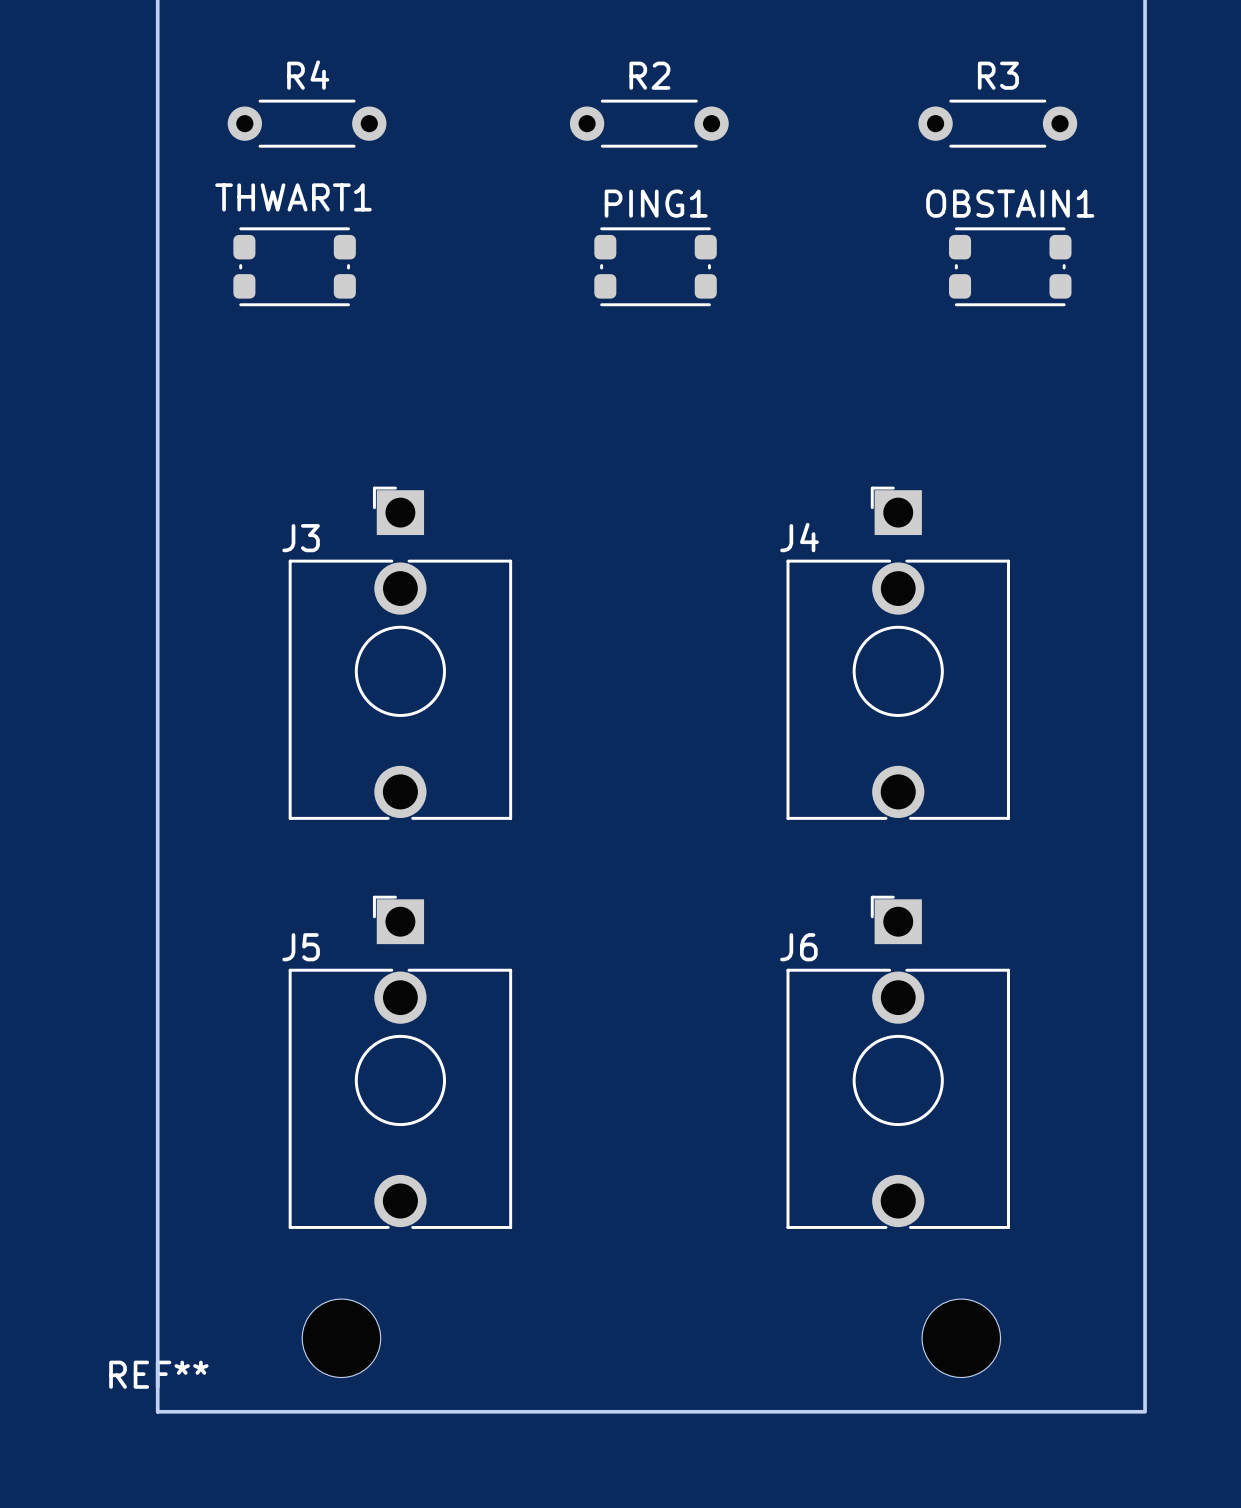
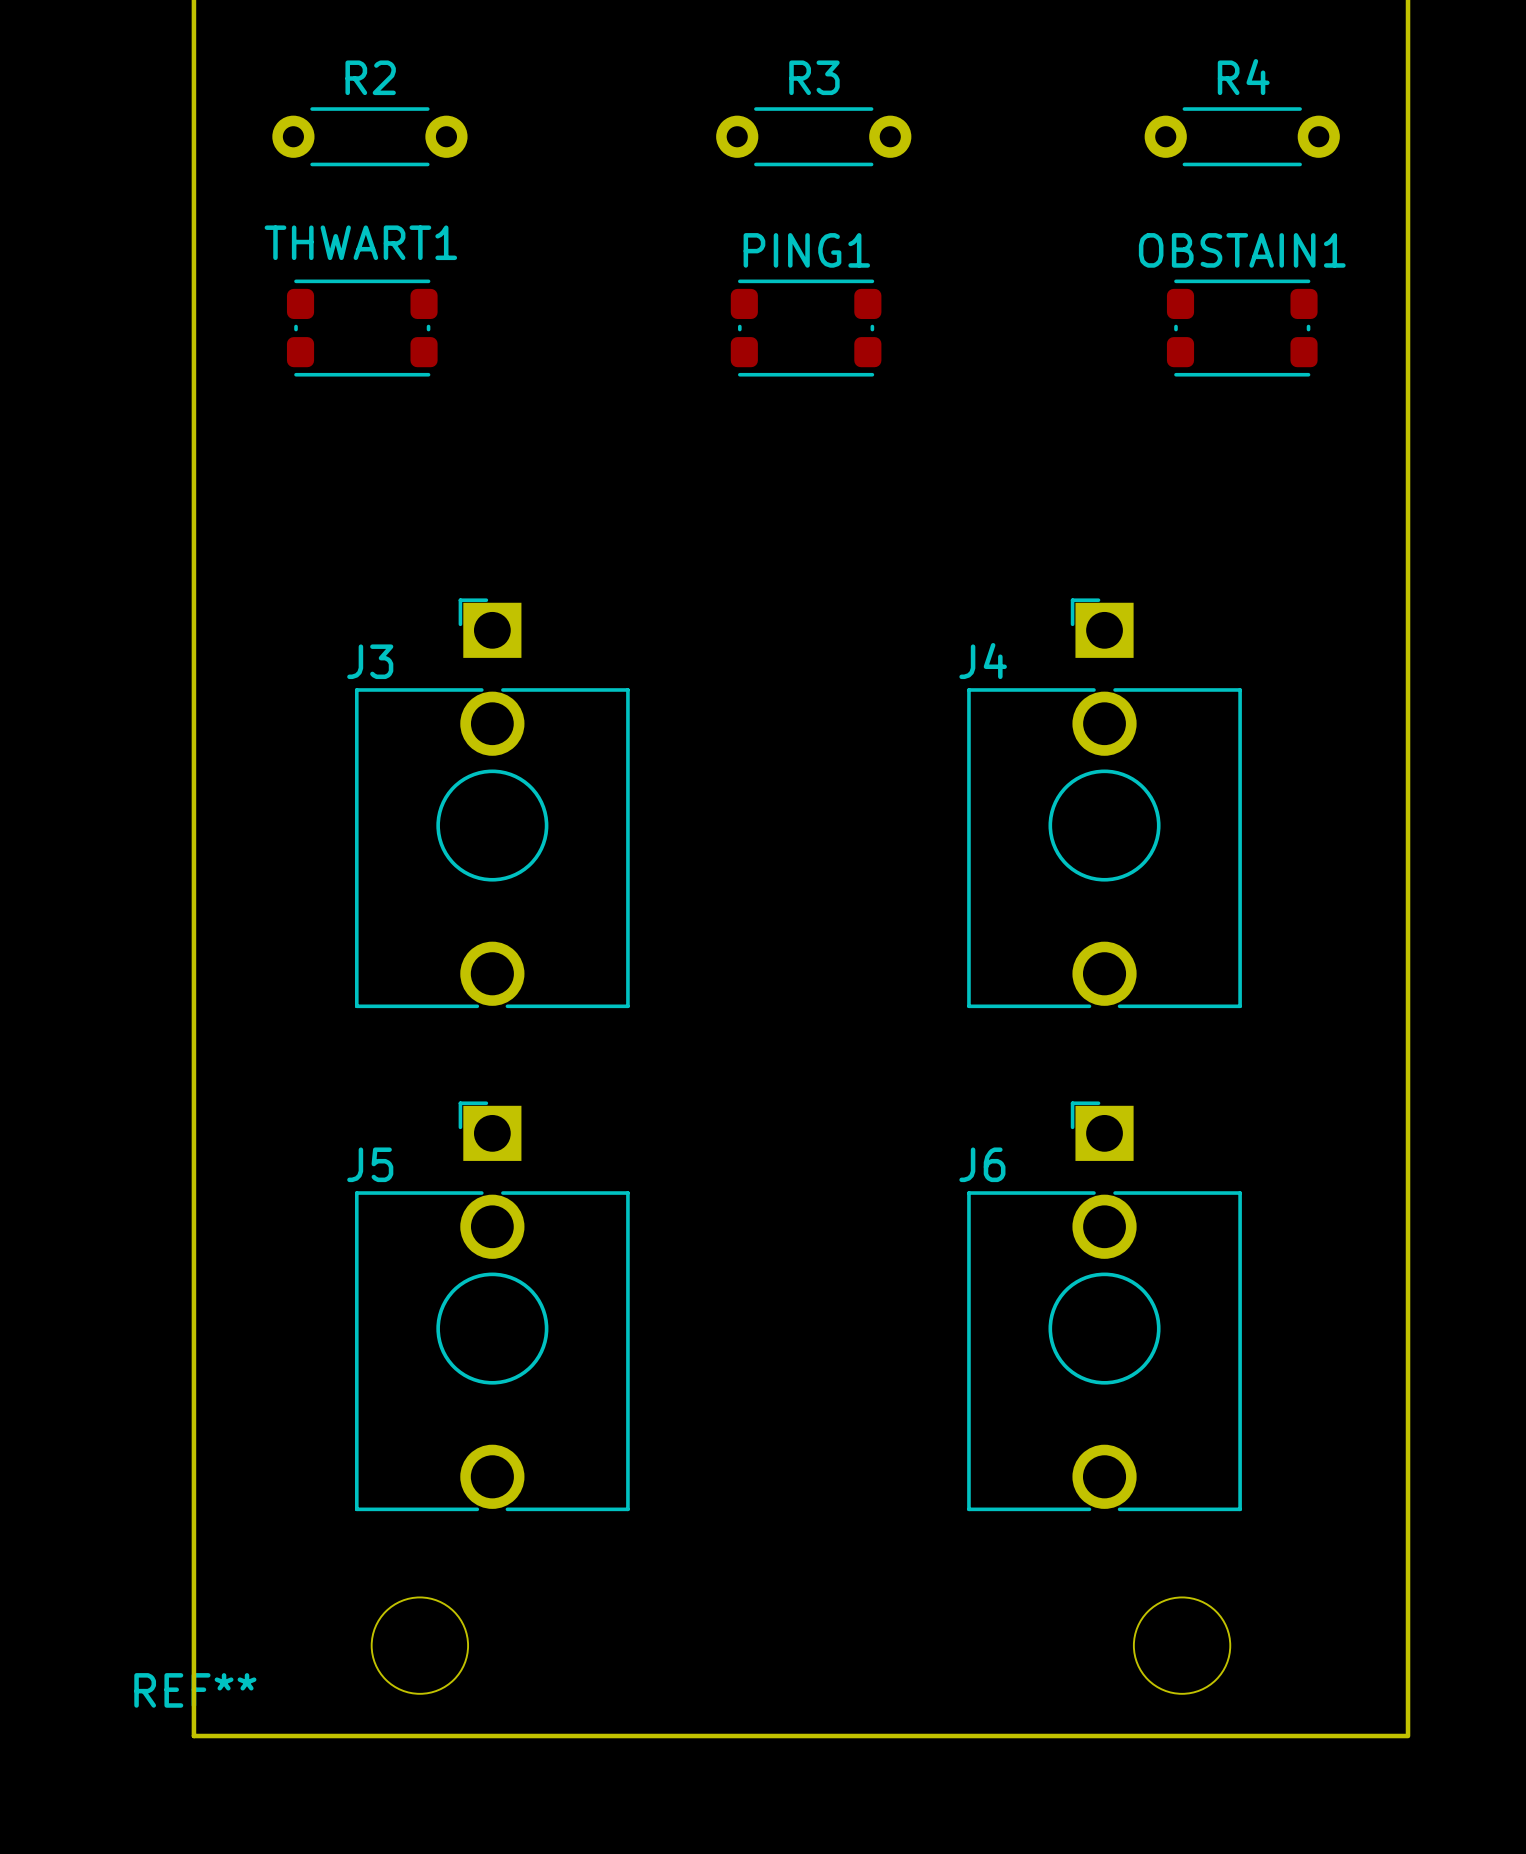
R4 position: (307, 123) -> (1242, 136)
R2 position: (649, 123) -> (369, 136)
R3 position: (997, 123) -> (813, 136)

